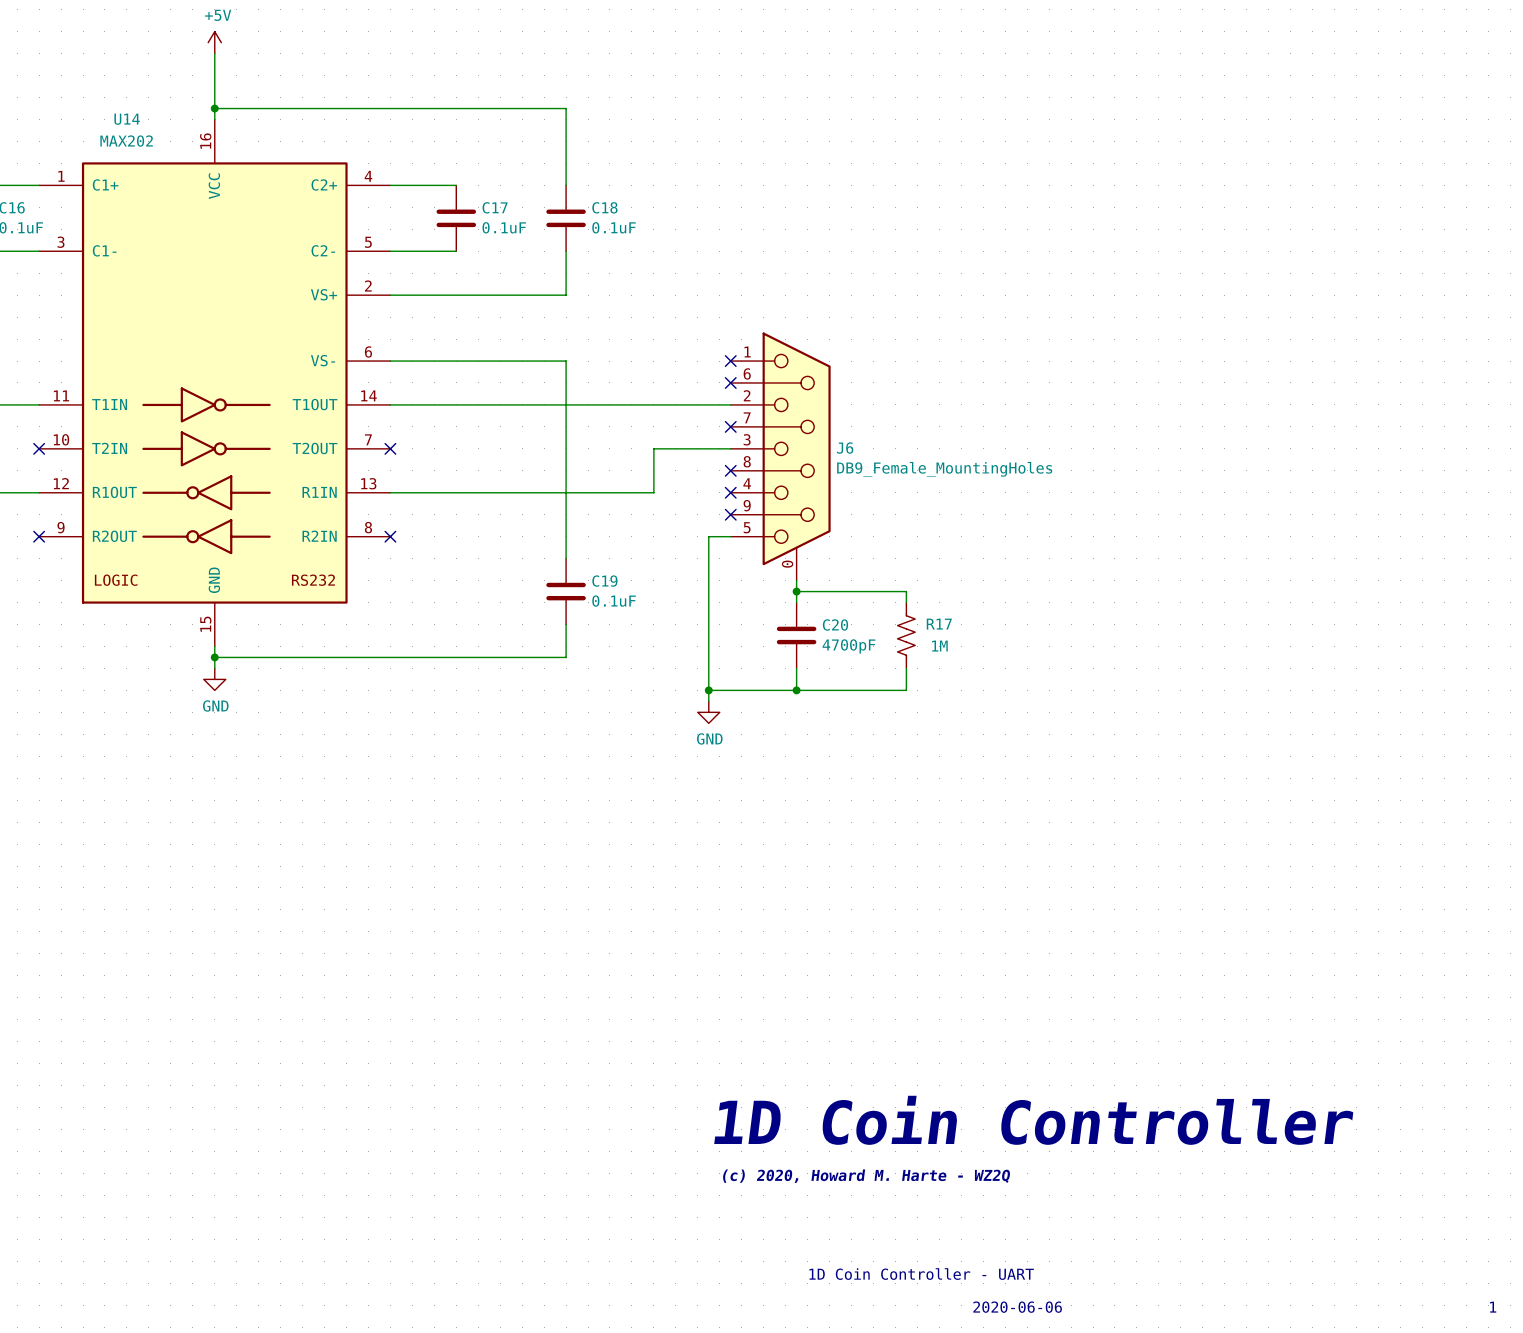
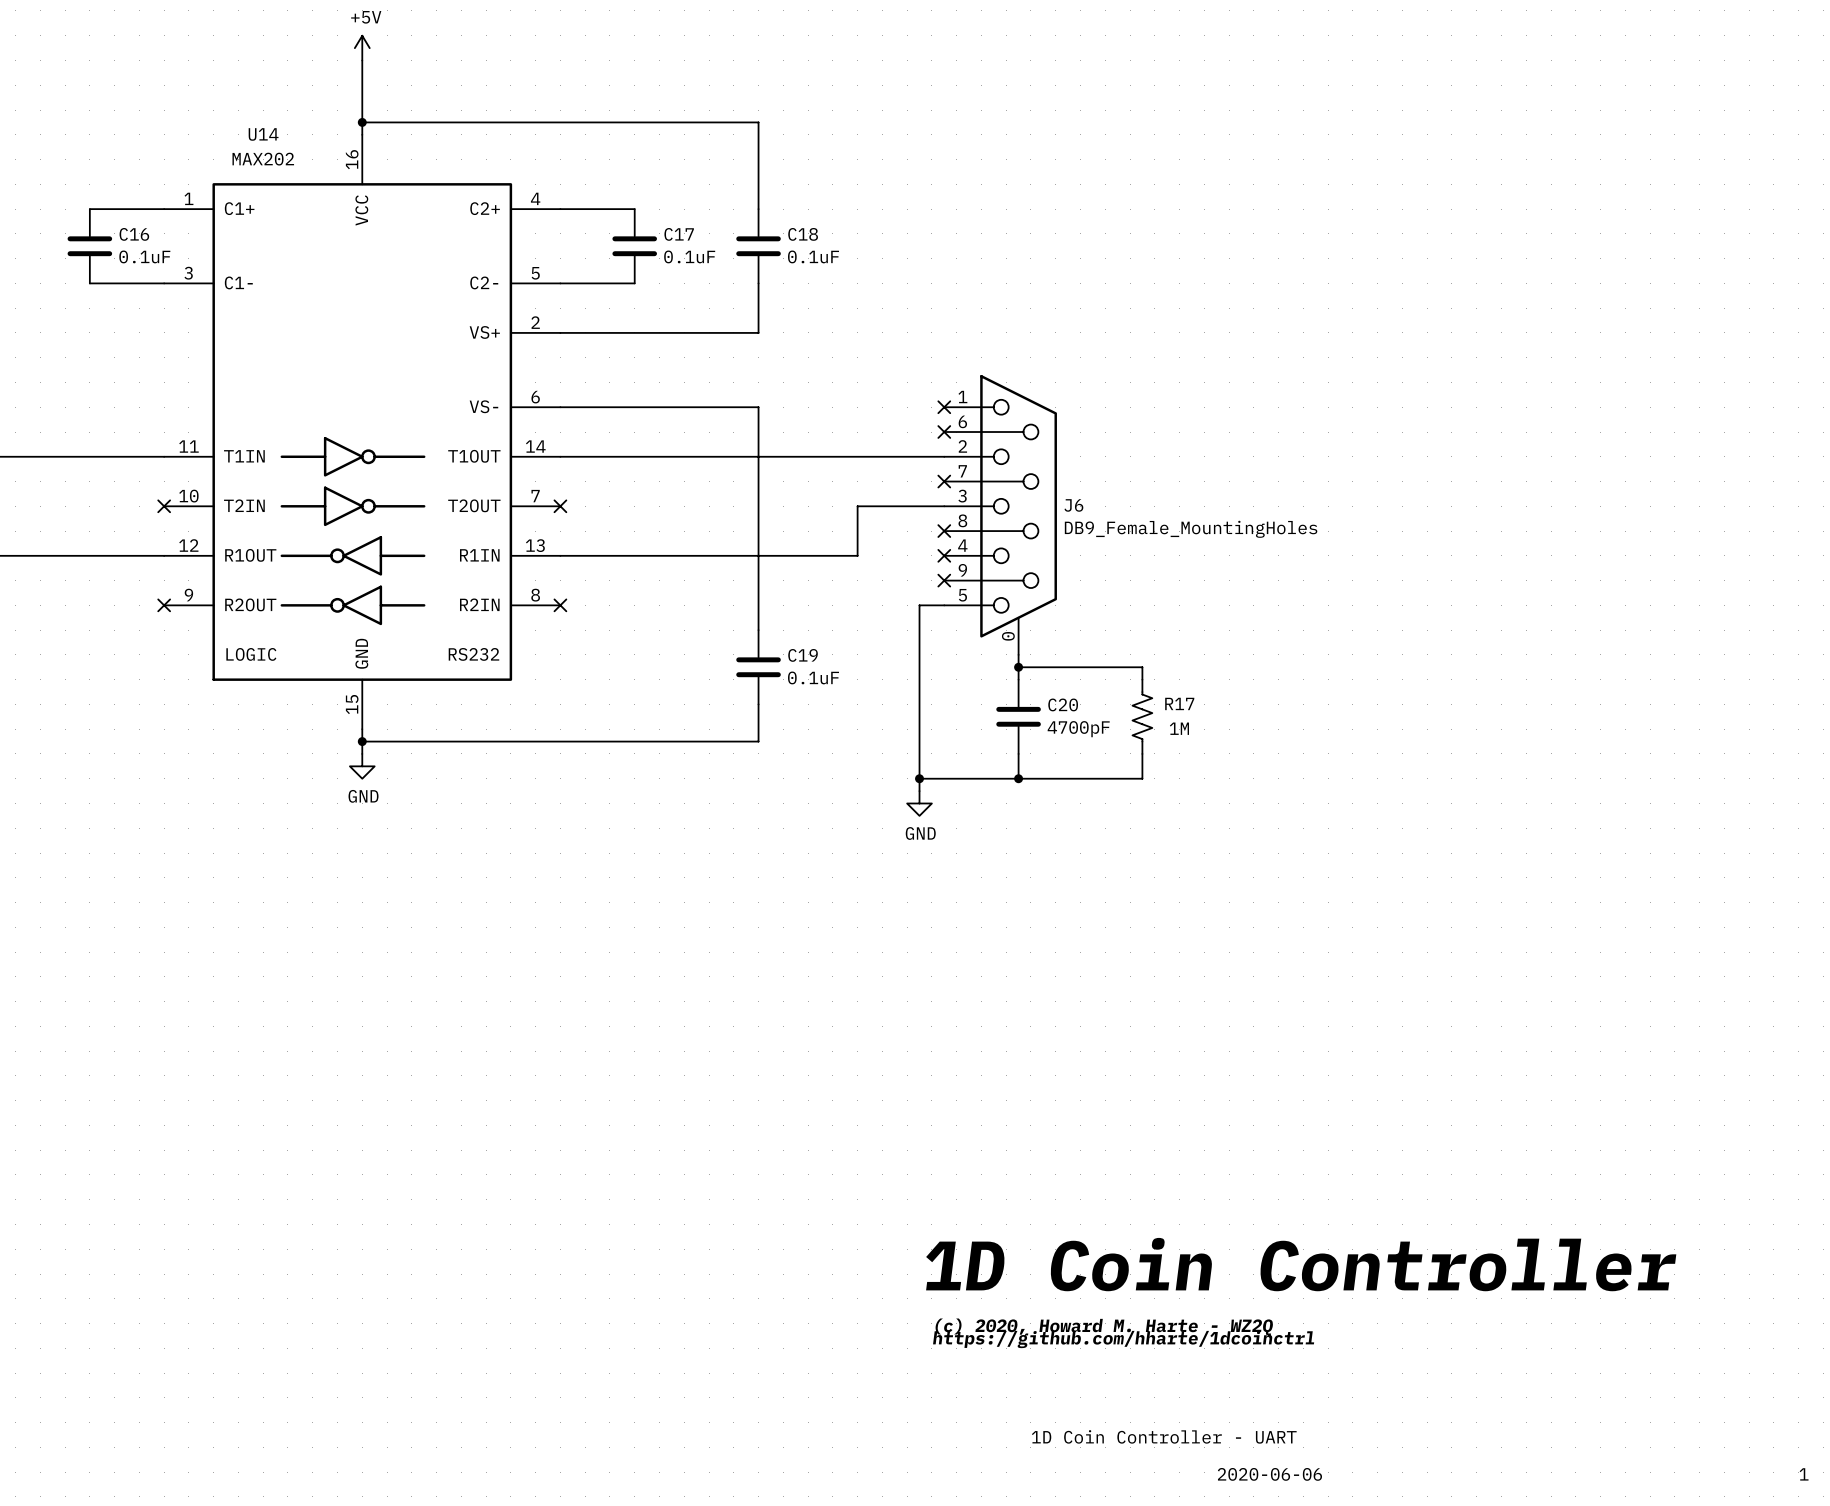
text: none -> https://github.com/hharte/1dcoinctrl (1123, 1339)

